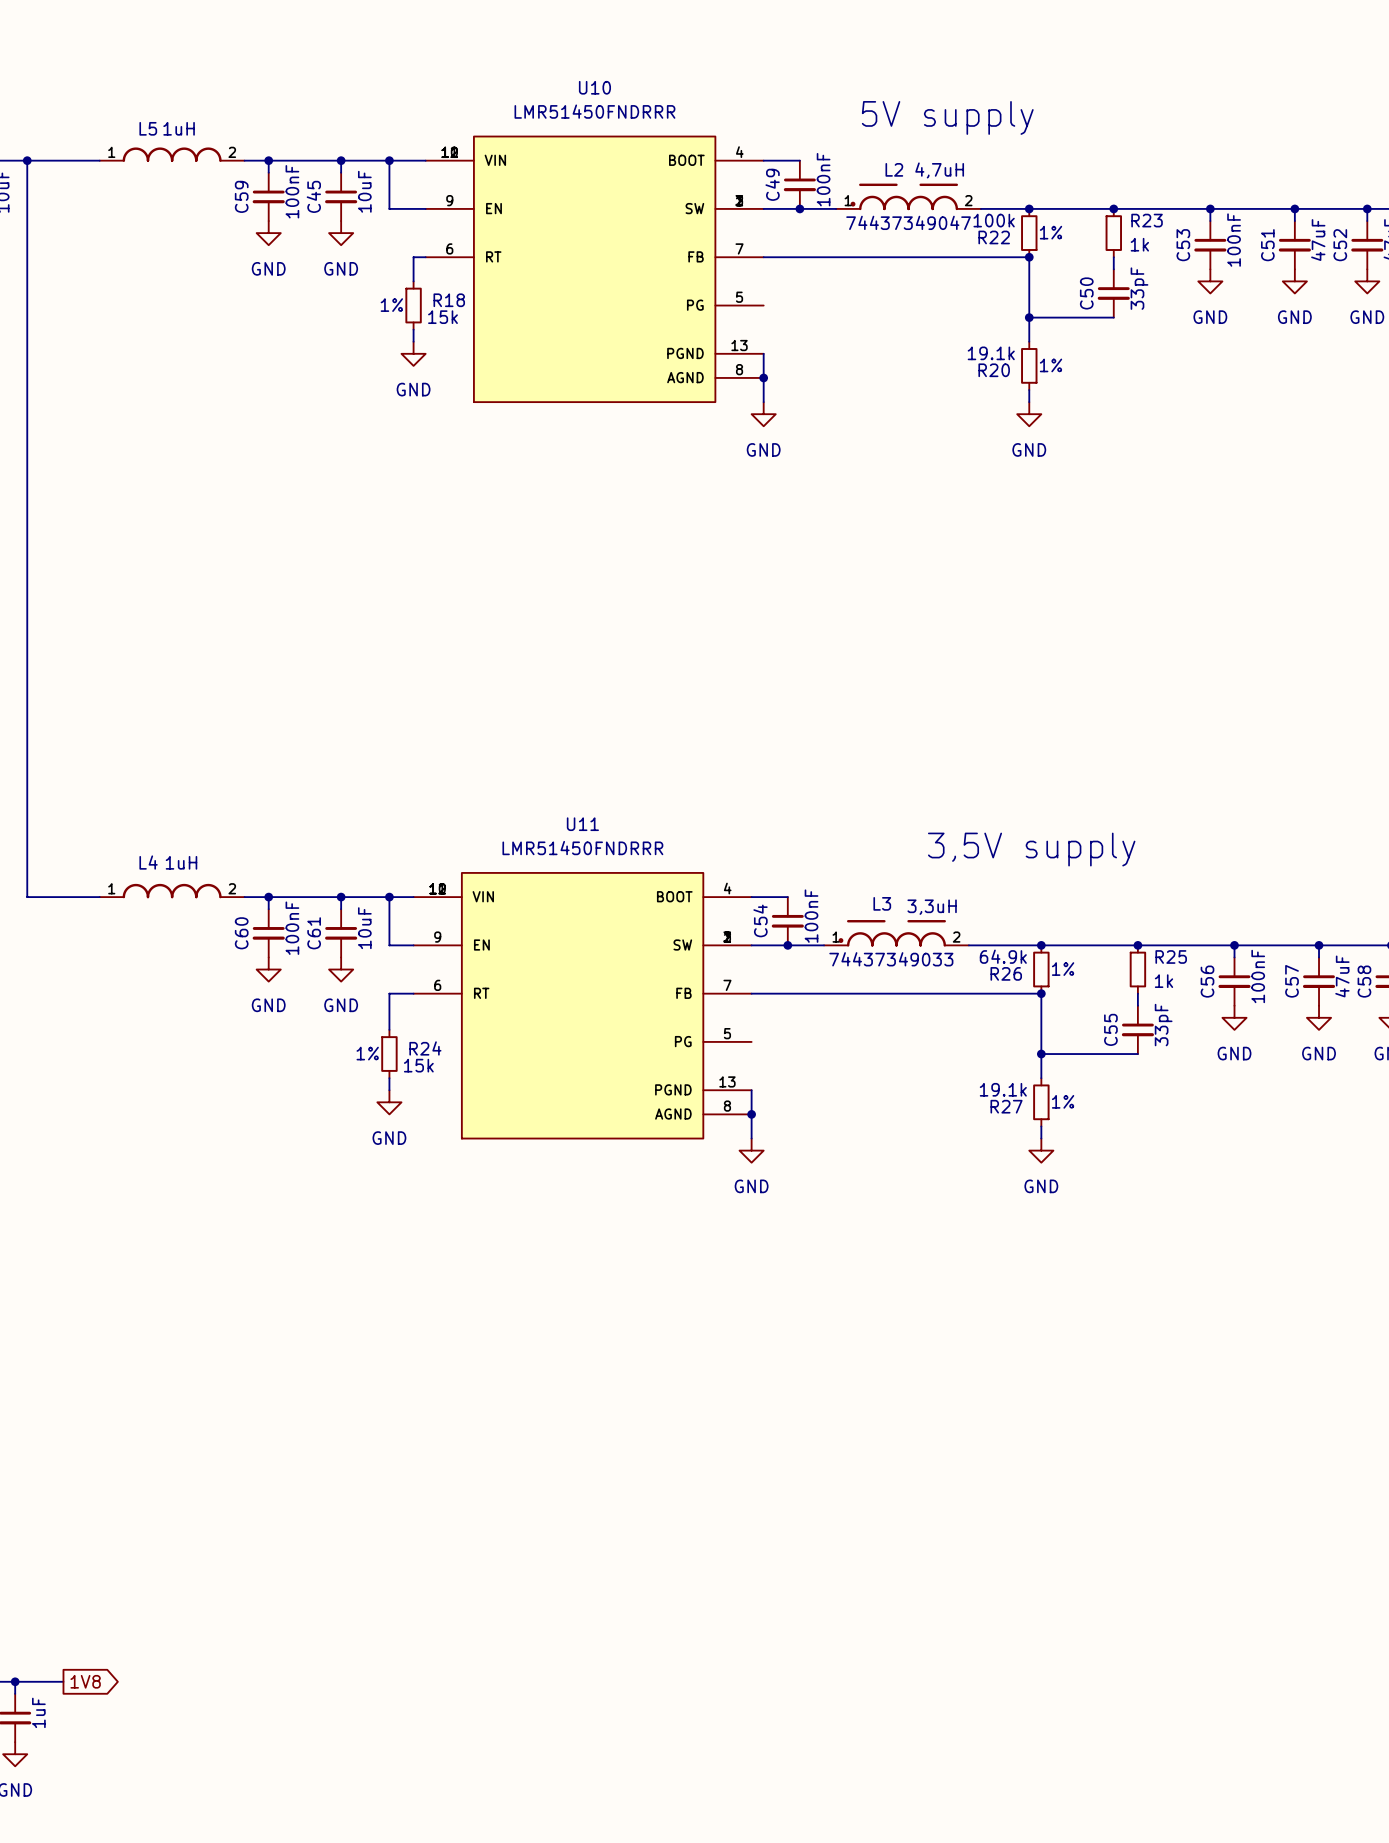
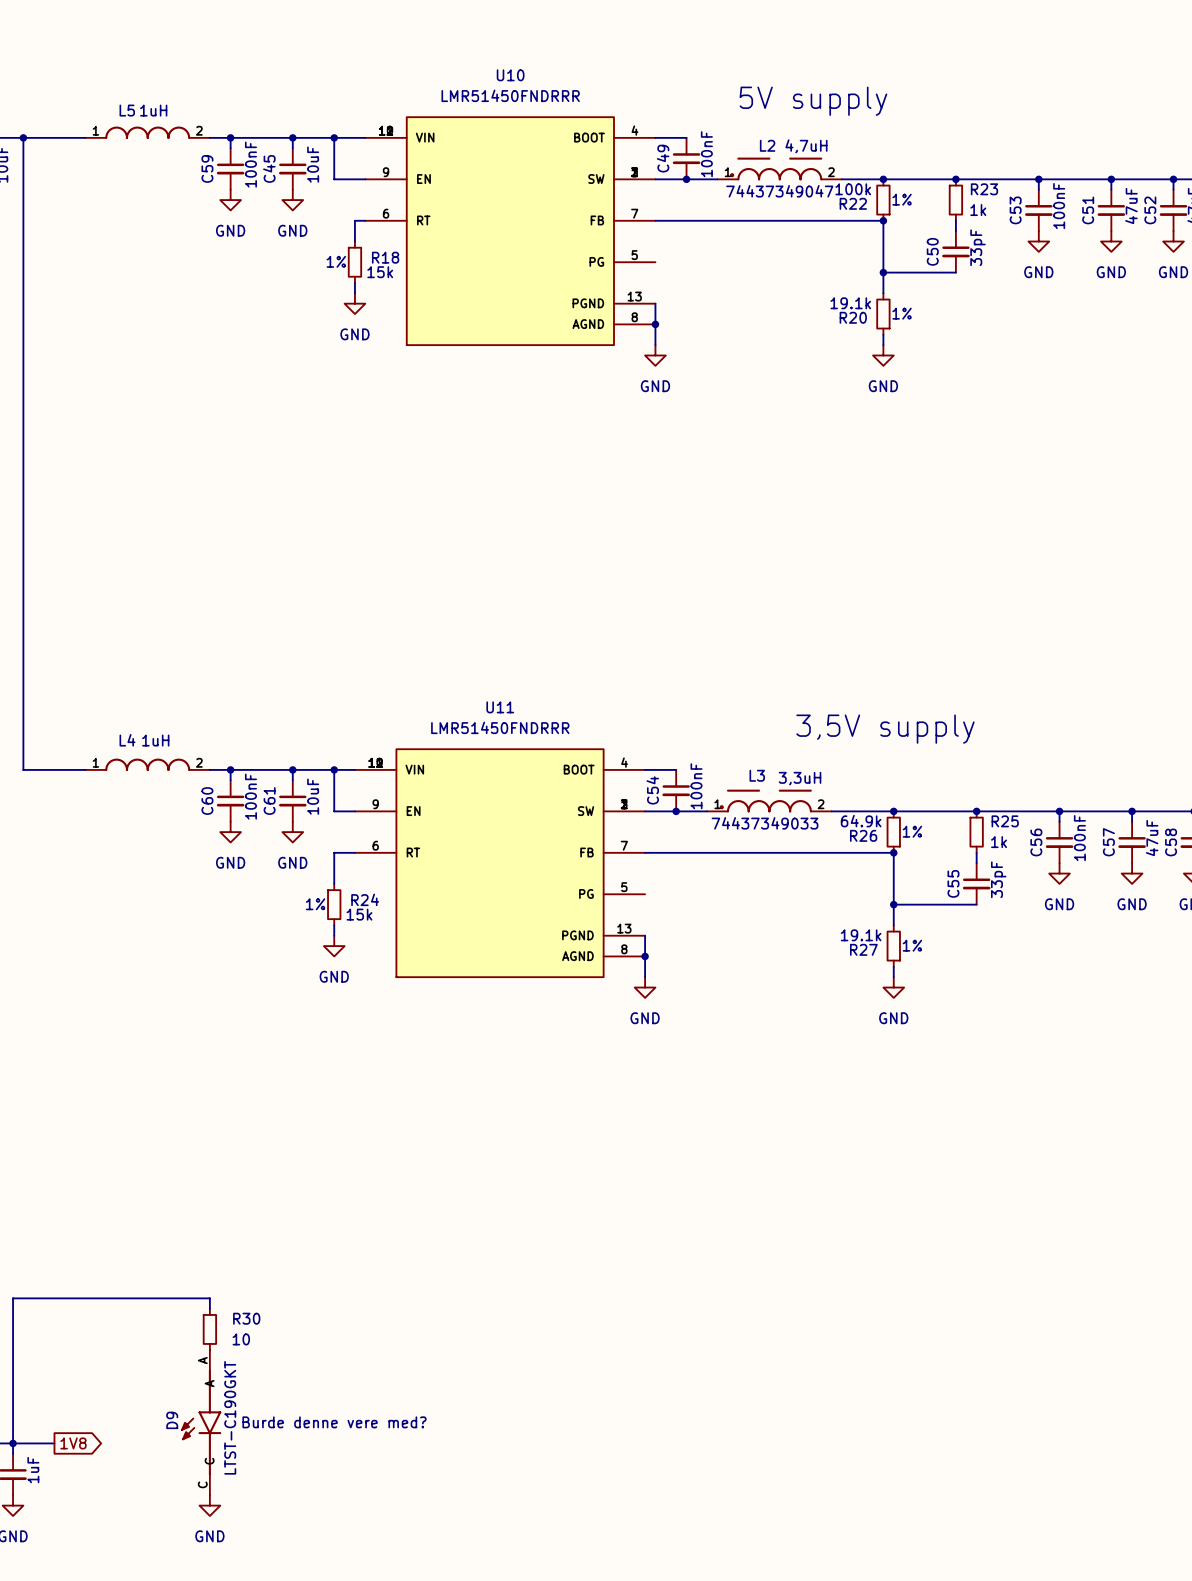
wire: none -> (209, 1308) (209, 1298) (13, 1298) (13, 1443)
R30: none -> 10 (209, 1329)
D9: none -> LTST-C190GKT (201, 1422)
text: none -> Burde denne vere med? (334, 1422)
power symbol: none -> GND (209, 1505)

